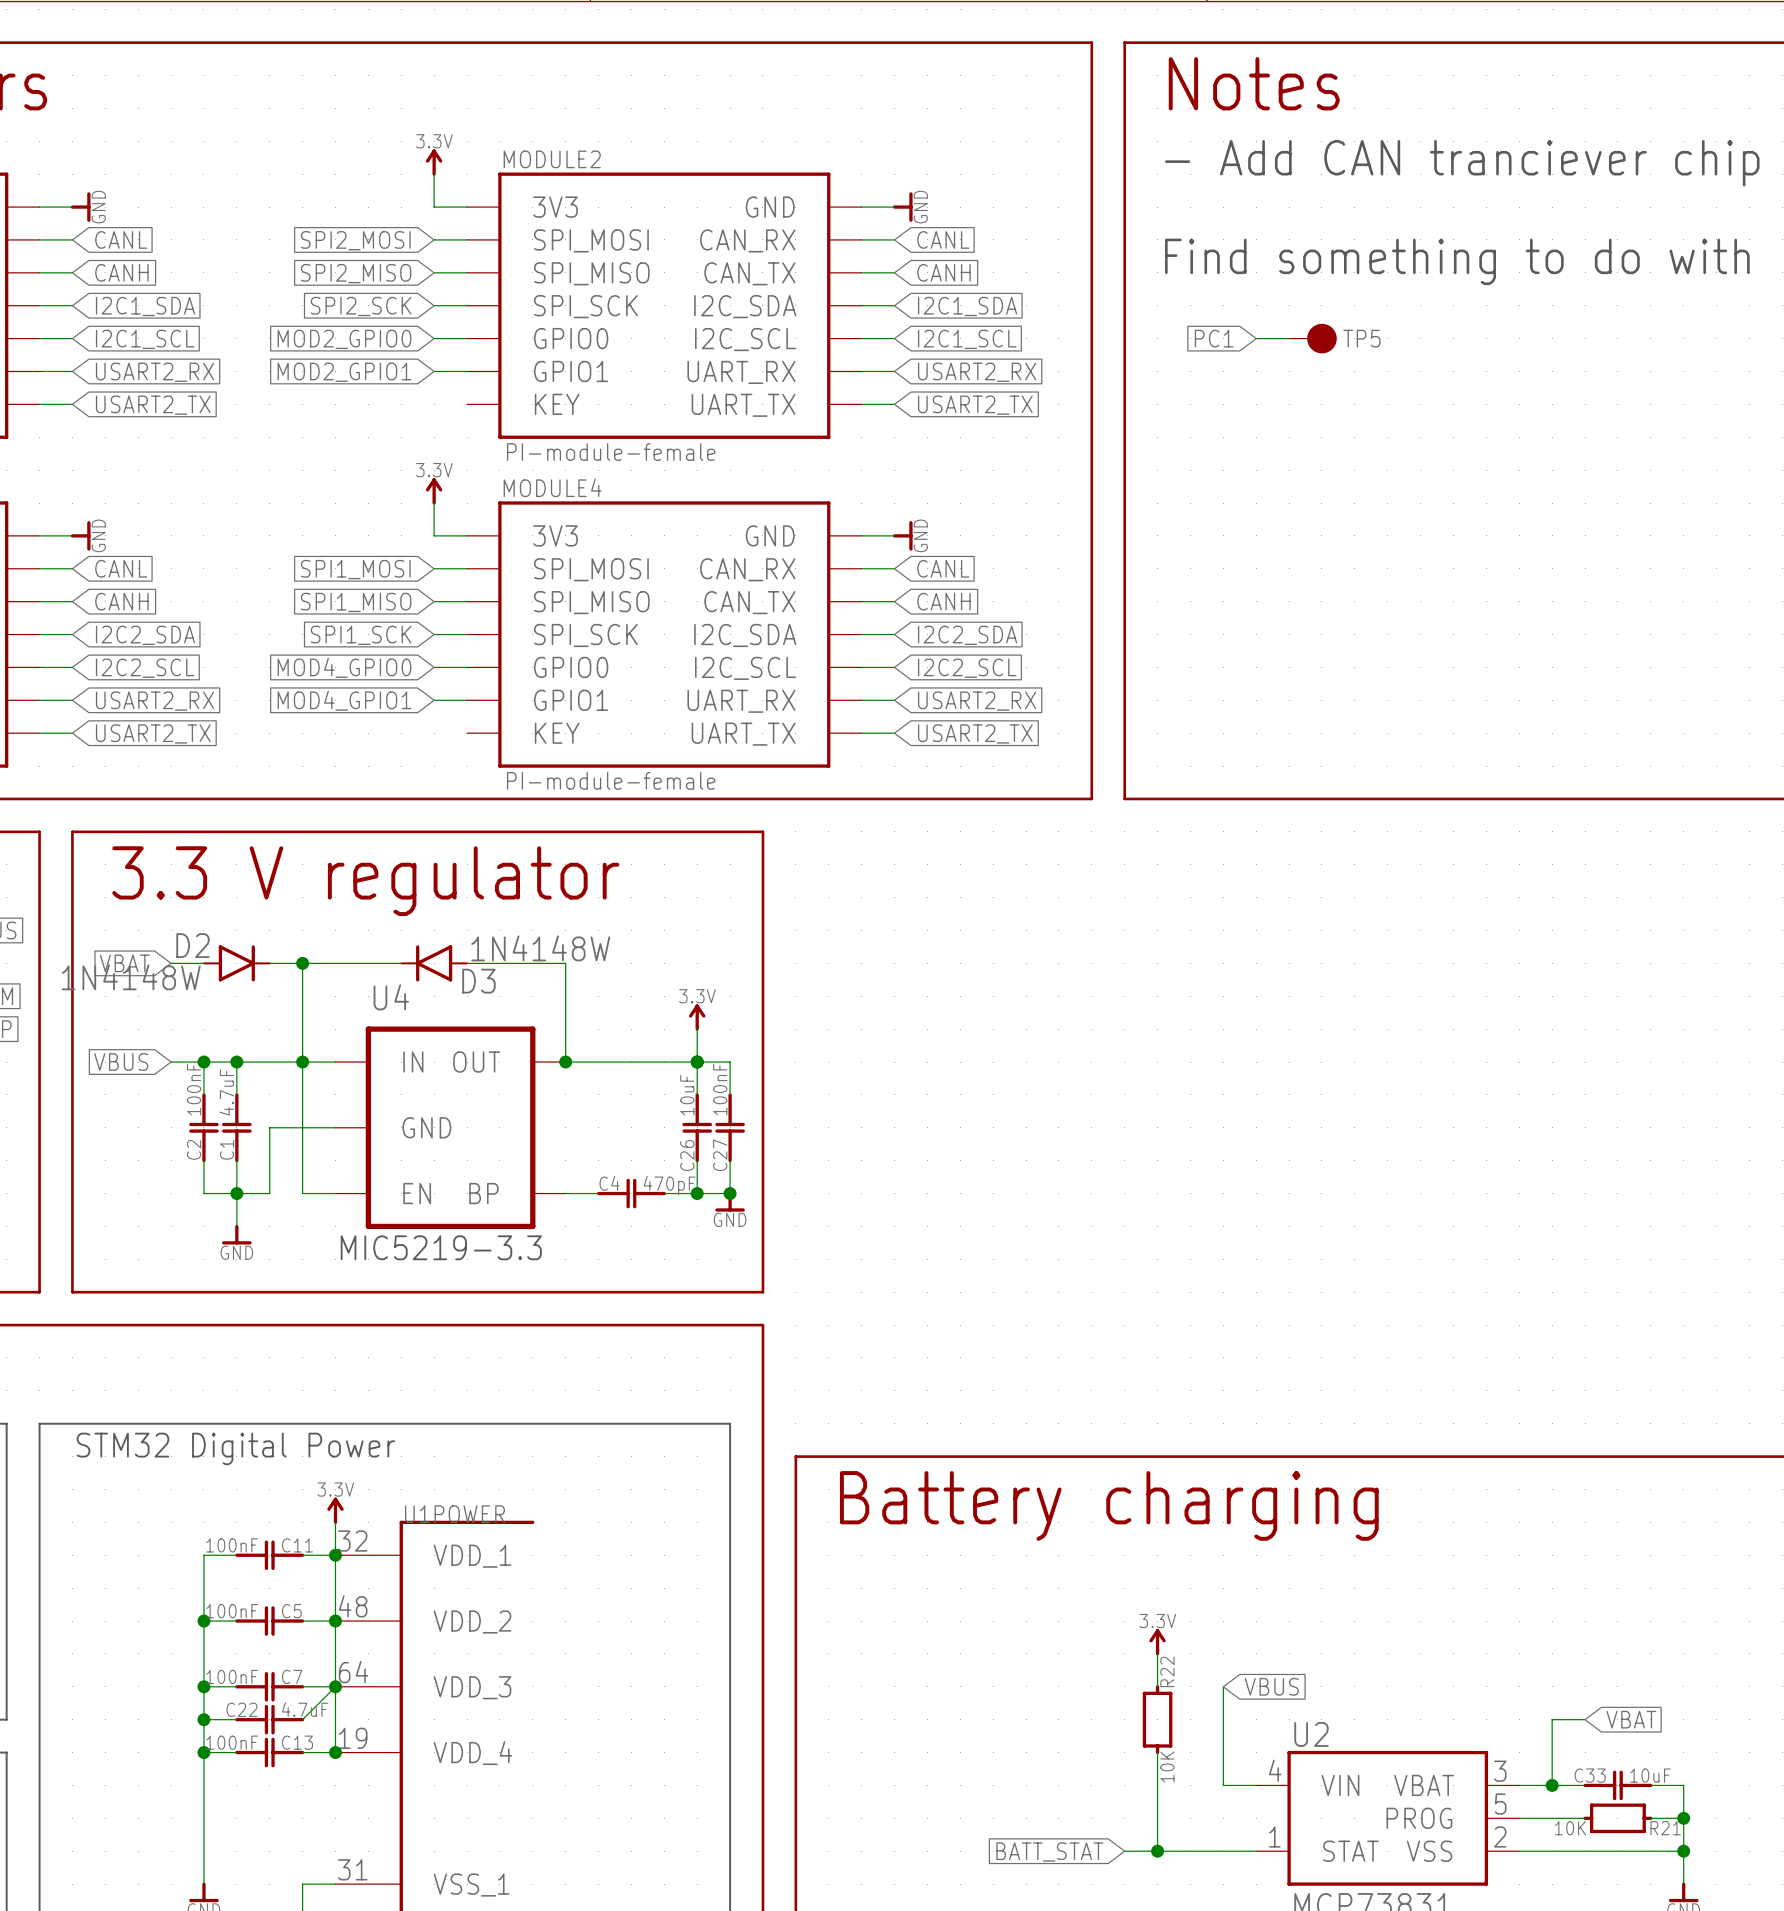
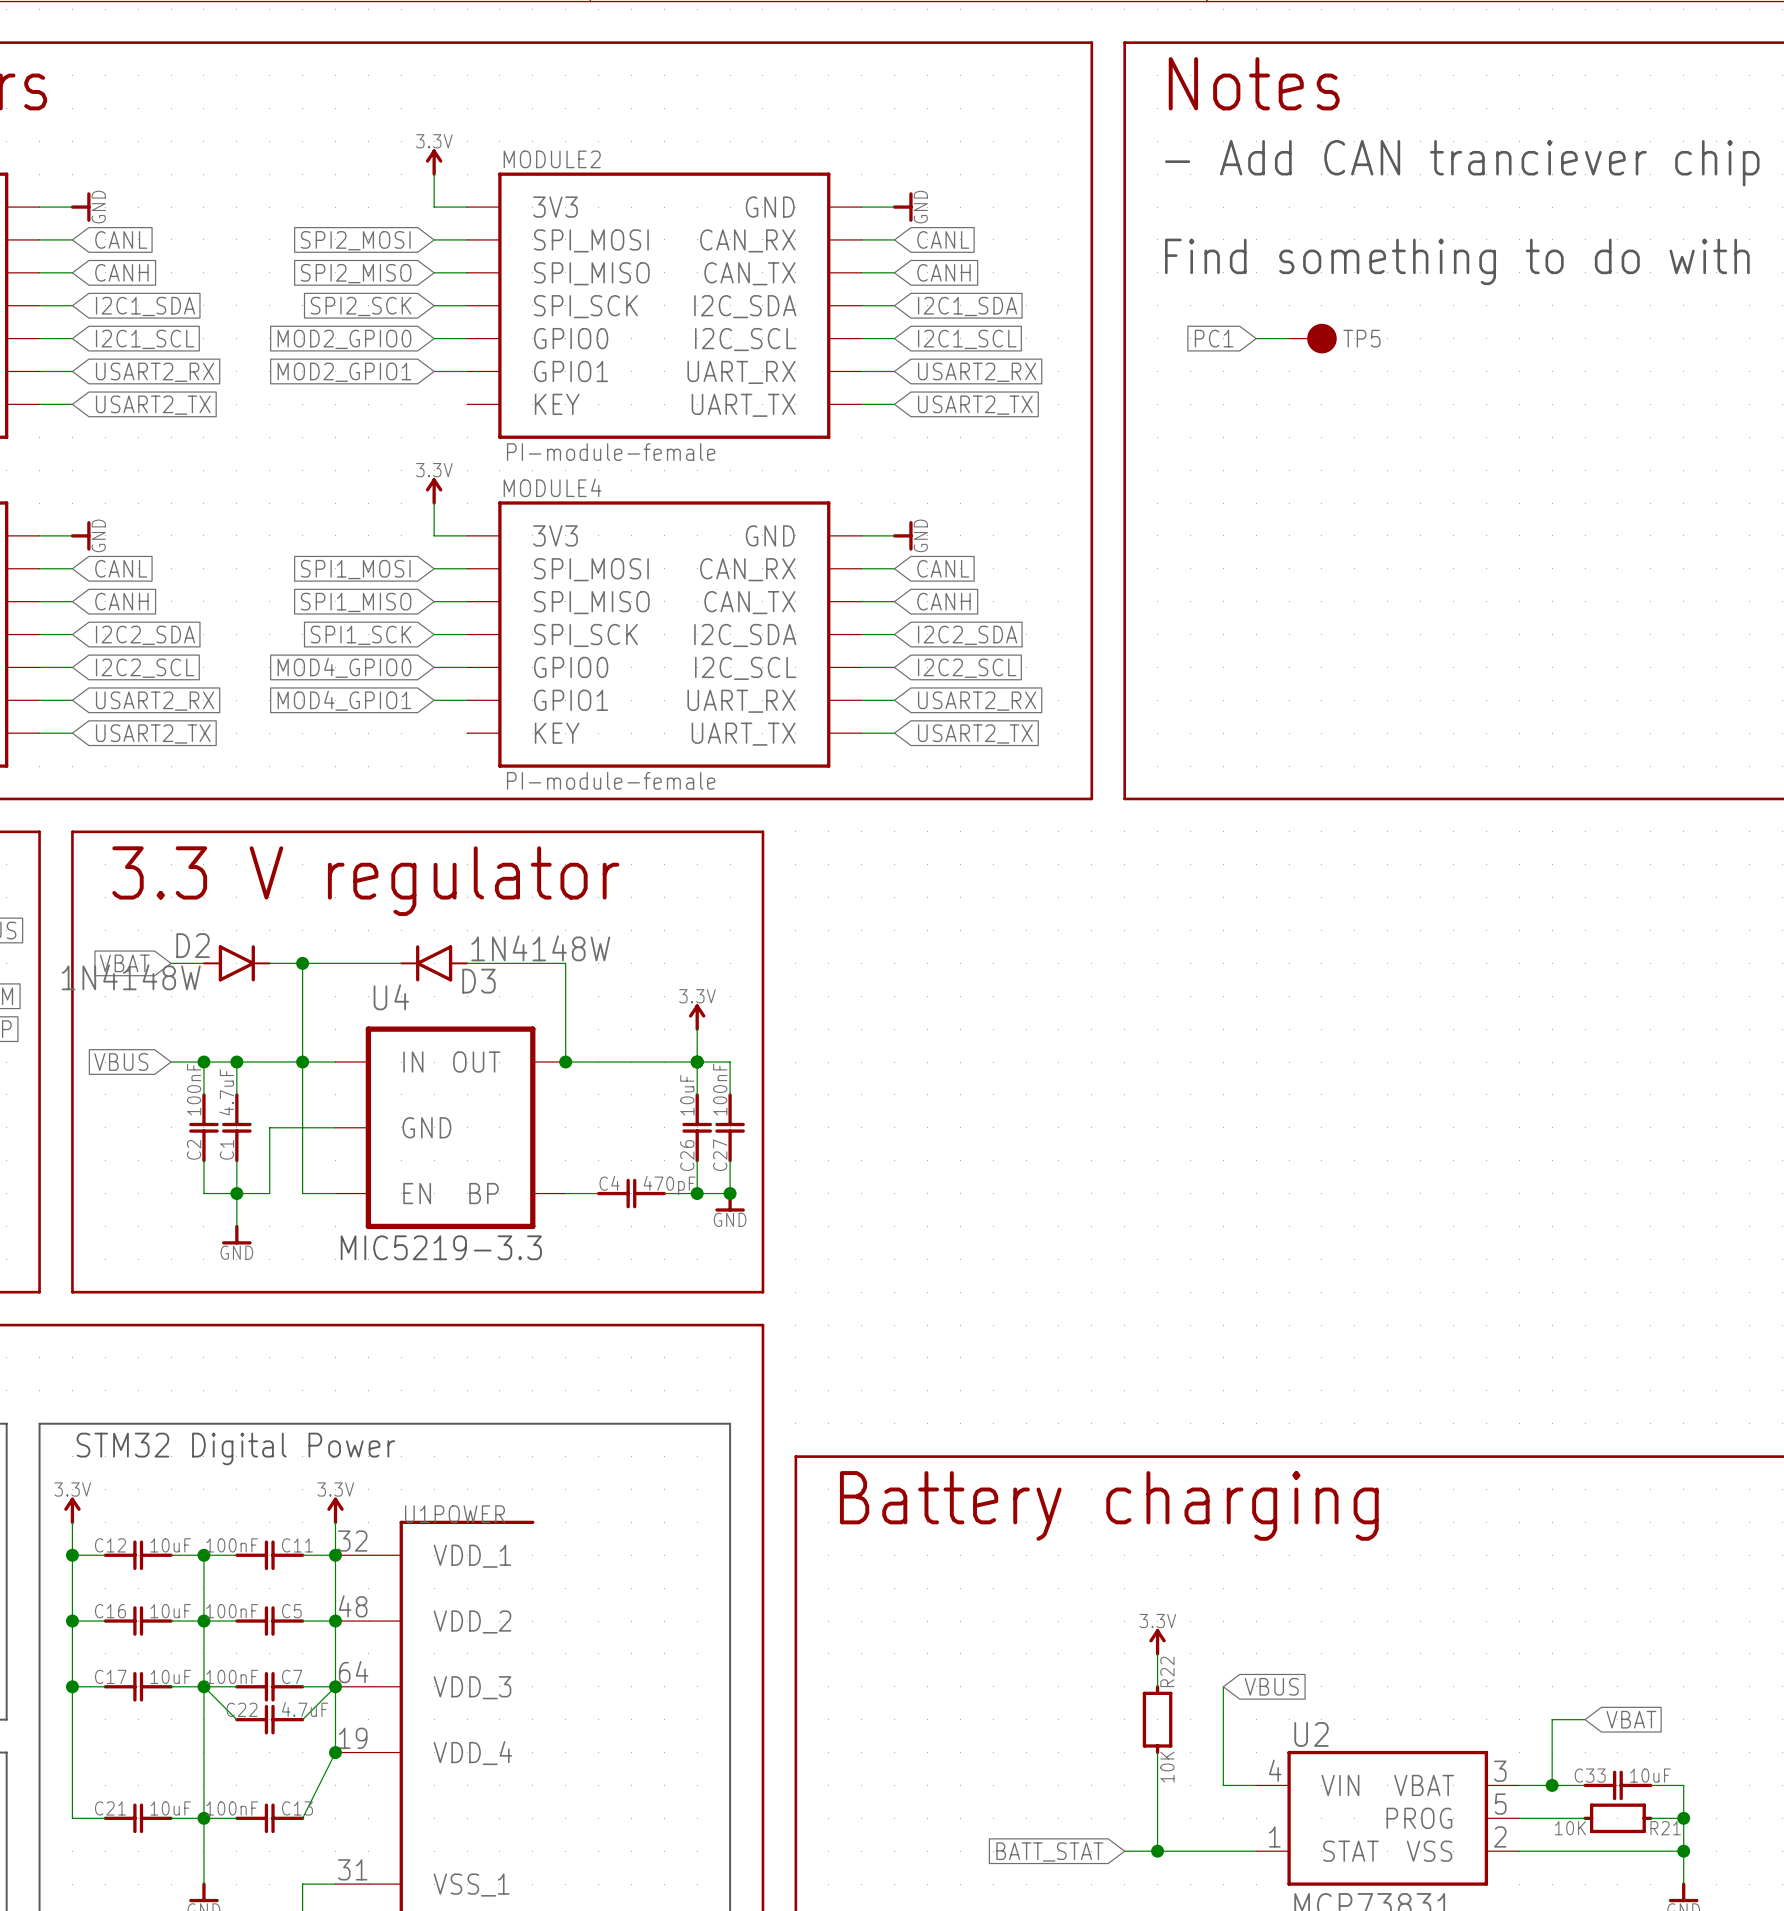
power symbol: none -> 3.3V (72, 1510)
wire: none -> (72, 1522) (72, 1818) (105, 1818)
wire: none -> (72, 1555) (105, 1555)
junction: none -> (72, 1555)
C12: none -> 10uF (138, 1555)
wire: none -> (171, 1555) (203, 1555)
junction: none -> (203, 1555)
junction: none -> (72, 1621)
C16: none -> 10uF (138, 1621)
wire: none -> (171, 1621) (203, 1621)
wire: none -> (72, 1686) (105, 1686)
junction: none -> (72, 1686)
C17: none -> 10uF (138, 1686)
wire: (203, 1719) (236, 1719) -> (171, 1686) (203, 1686) (236, 1719)
junction: (203, 1719) -> none
wire: (203, 1752) (236, 1752) -> (72, 1621) (105, 1621)
junction: (203, 1752) -> none
C13 position: (269, 1752) -> (269, 1818)
wire: (302, 1752) (335, 1752) -> (302, 1818) (335, 1752)
C21: none -> 10uF (138, 1818)
wire: none -> (171, 1818) (236, 1818)
junction: none -> (203, 1818)

